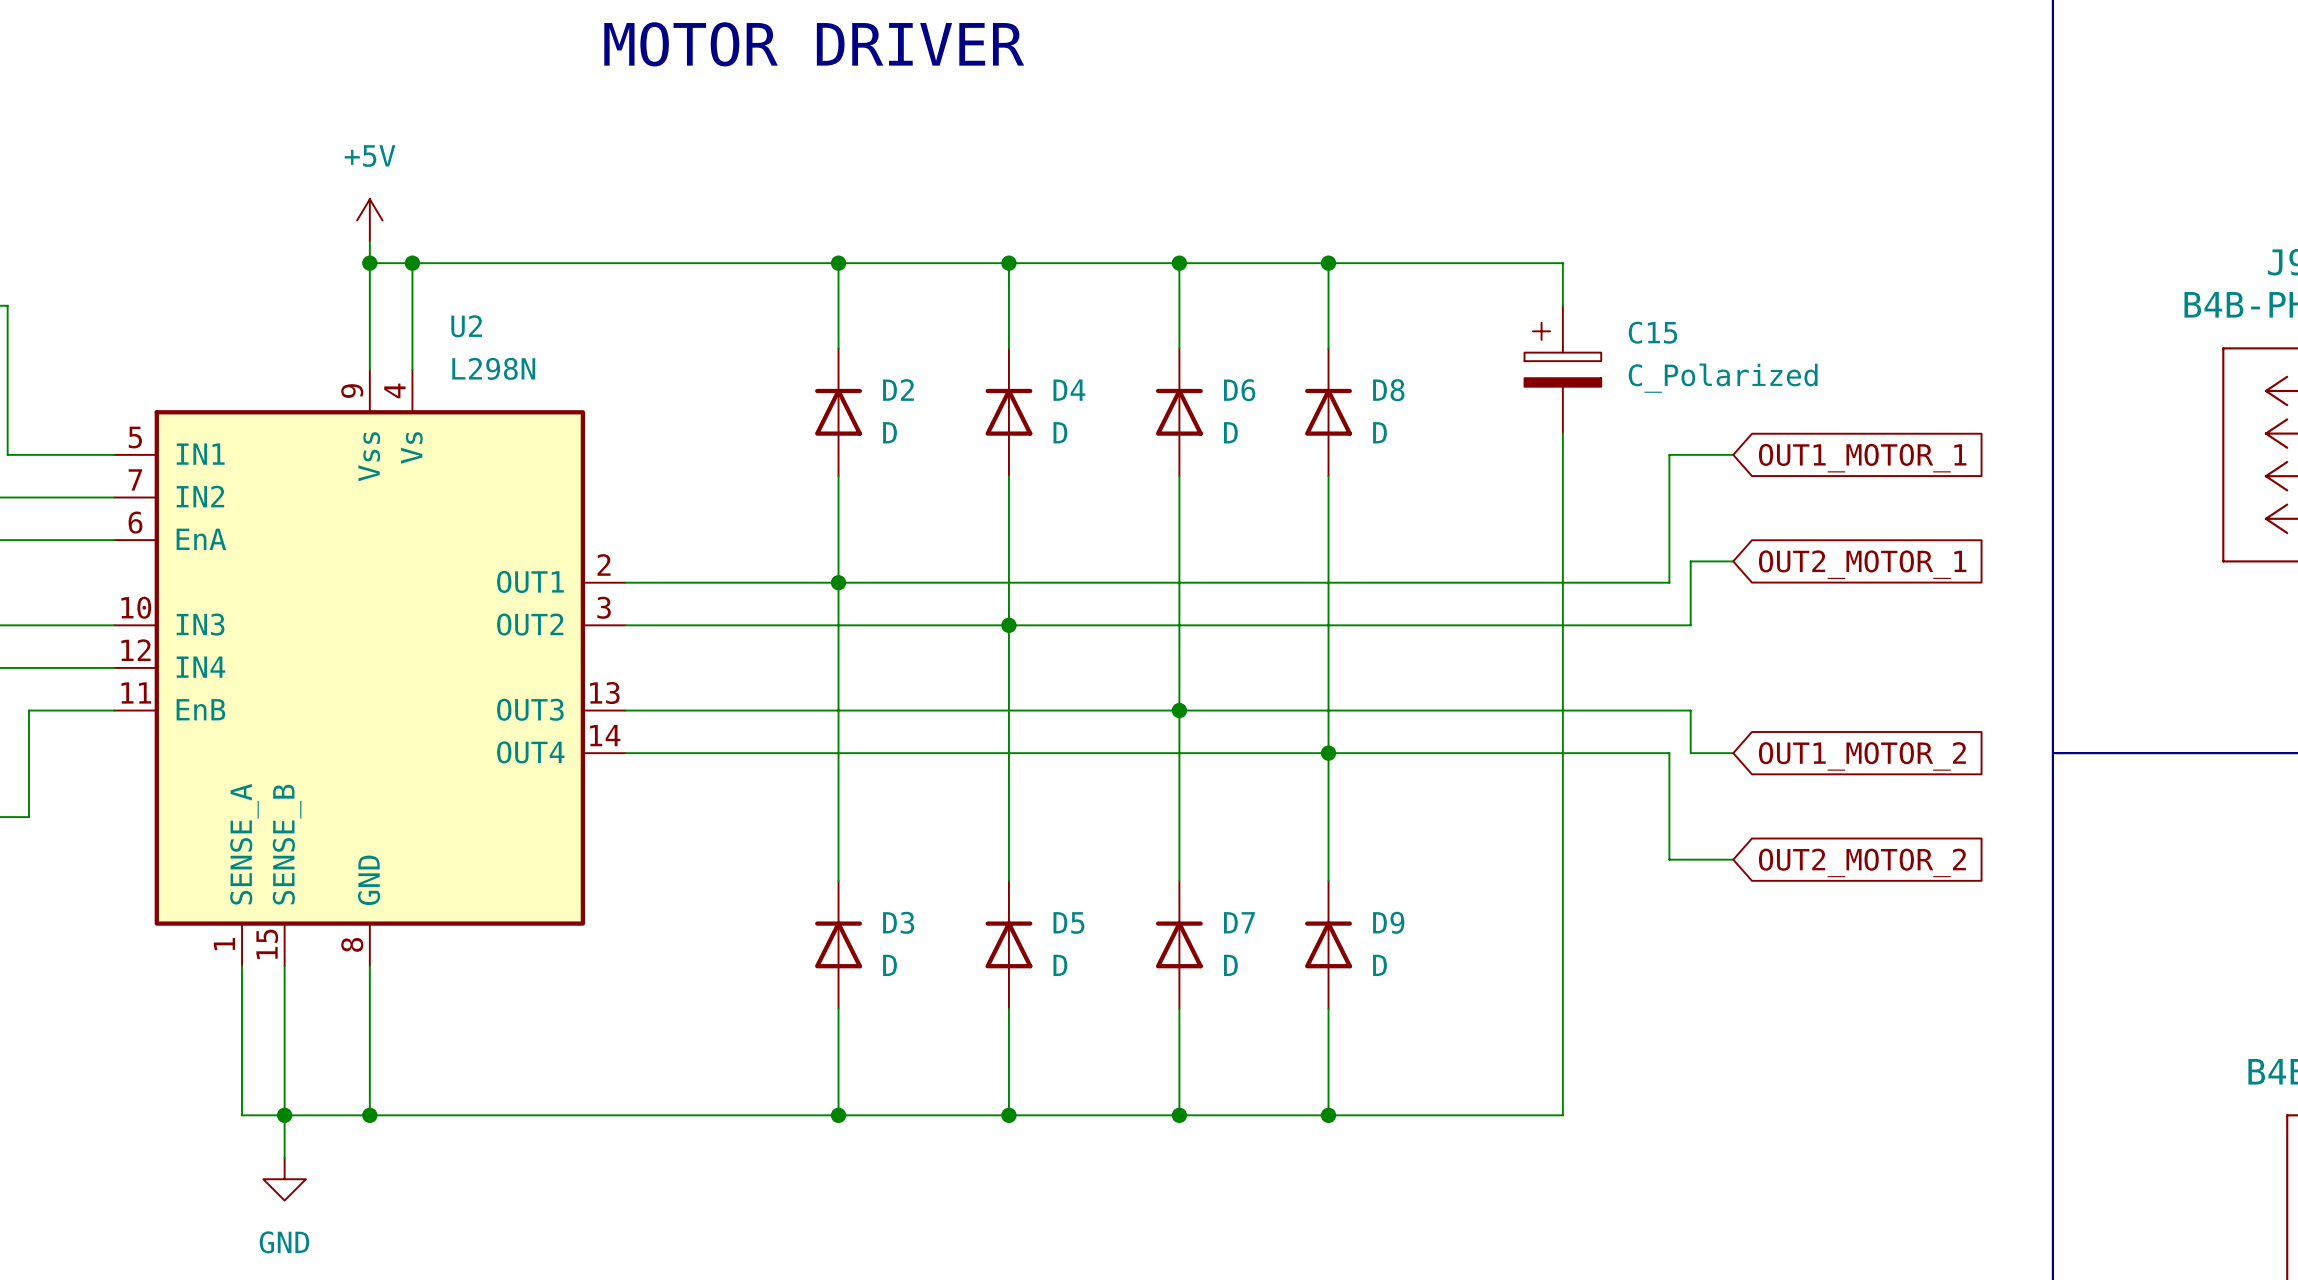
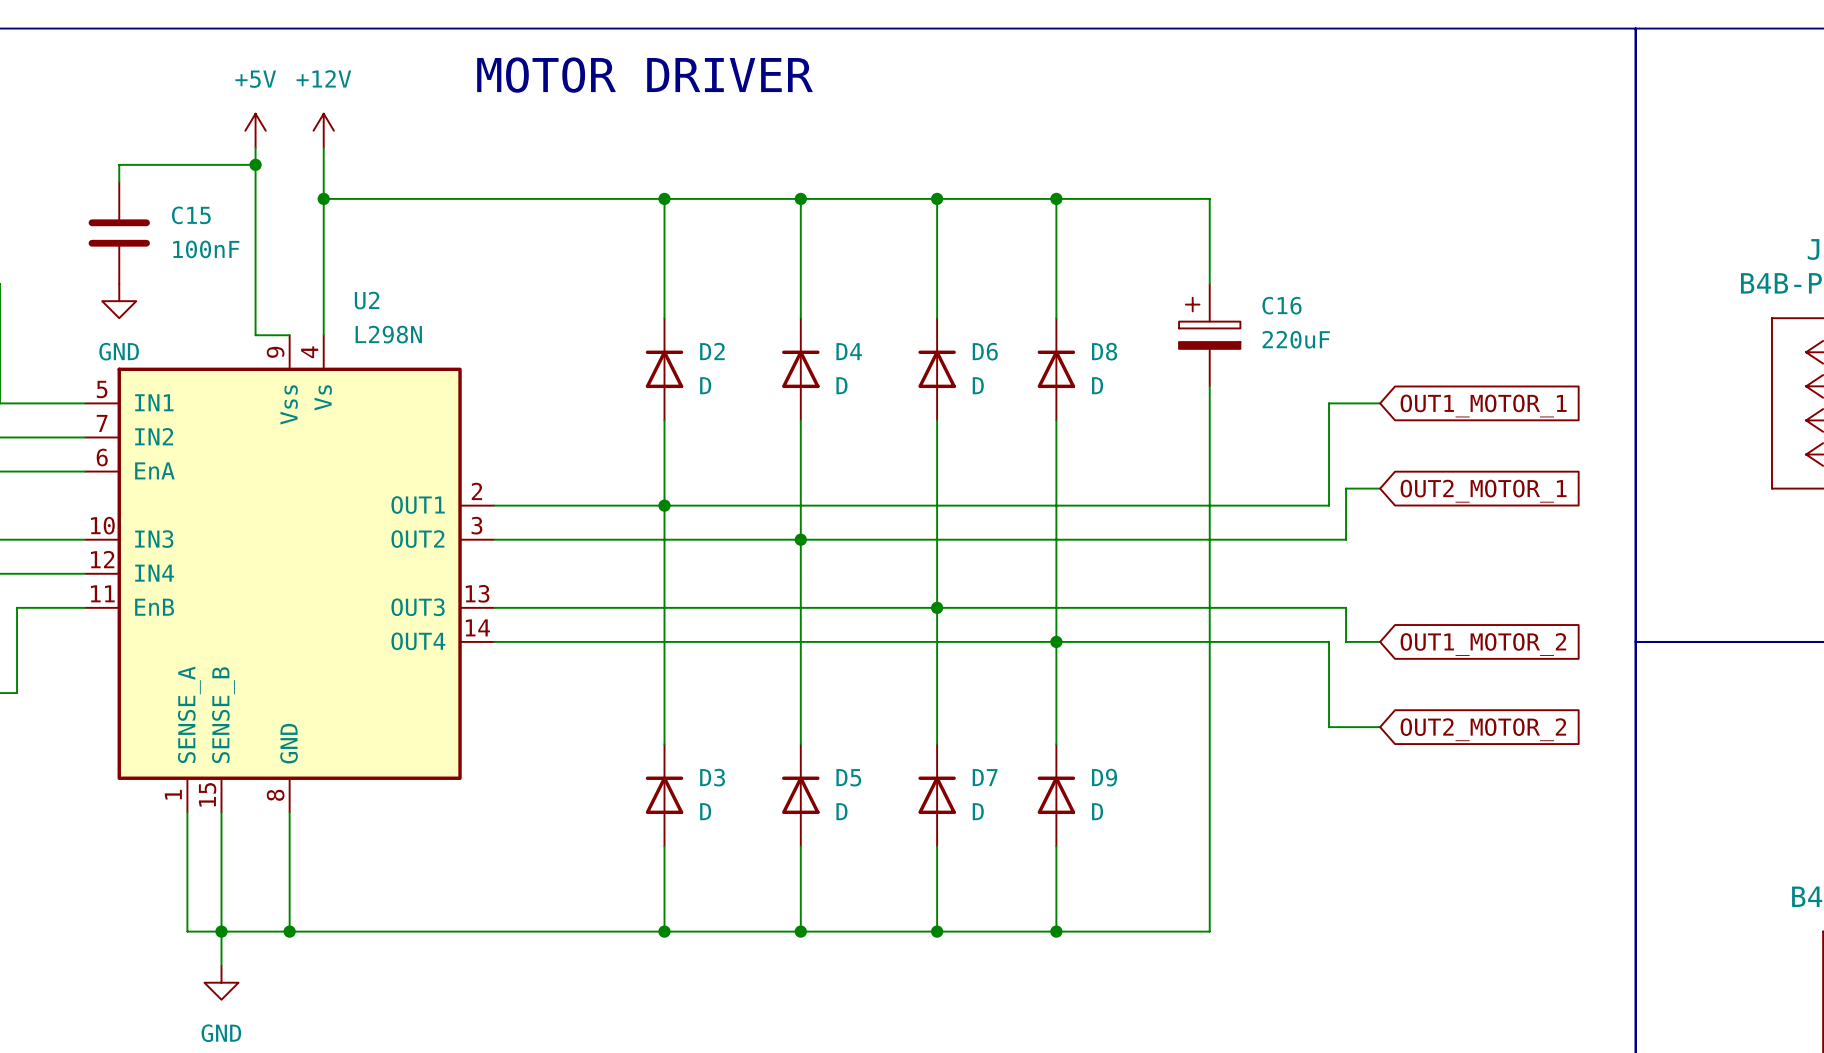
power symbol: none -> +12V (323, 130)
wire: none -> (323, 147) (323, 250)
wire: none -> (255, 164) (119, 164) (119, 181)
junction: none -> (255, 164)
wire: none -> (323, 198) (1209, 198) (1209, 284)
junction: none -> (323, 198)
wire: none -> (664, 198) (664, 250)
wire: none -> (800, 198) (800, 250)
wire: none -> (937, 198) (937, 250)
wire: none -> (1056, 198) (1056, 250)
power symbol position: +5V (369, 220) -> +5V (255, 130)
wire: (369, 241) (369, 369) -> (255, 147) (255, 335) (289, 335)
wire: (369, 263) (1562, 263) (1562, 305) -> none
junction: (369, 263) -> none
junction: (412, 263) -> none
junction position: (838, 263) -> (664, 198)
junction position: (1008, 263) -> (800, 198)
junction position: (1179, 263) -> (937, 198)
junction position: (1328, 263) -> (1056, 198)
C15 symbol: [1524, 305, 1602, 434] -> [88, 181, 150, 285]
power symbol: none -> GND (119, 301)
C16: none -> 220uF (1209, 335)
C15 value: C_Polarized (1723, 378) -> 100nF (206, 249)
wire: (1562, 433) (1562, 1115) (1520, 1115) -> (1209, 386) (1209, 931)

